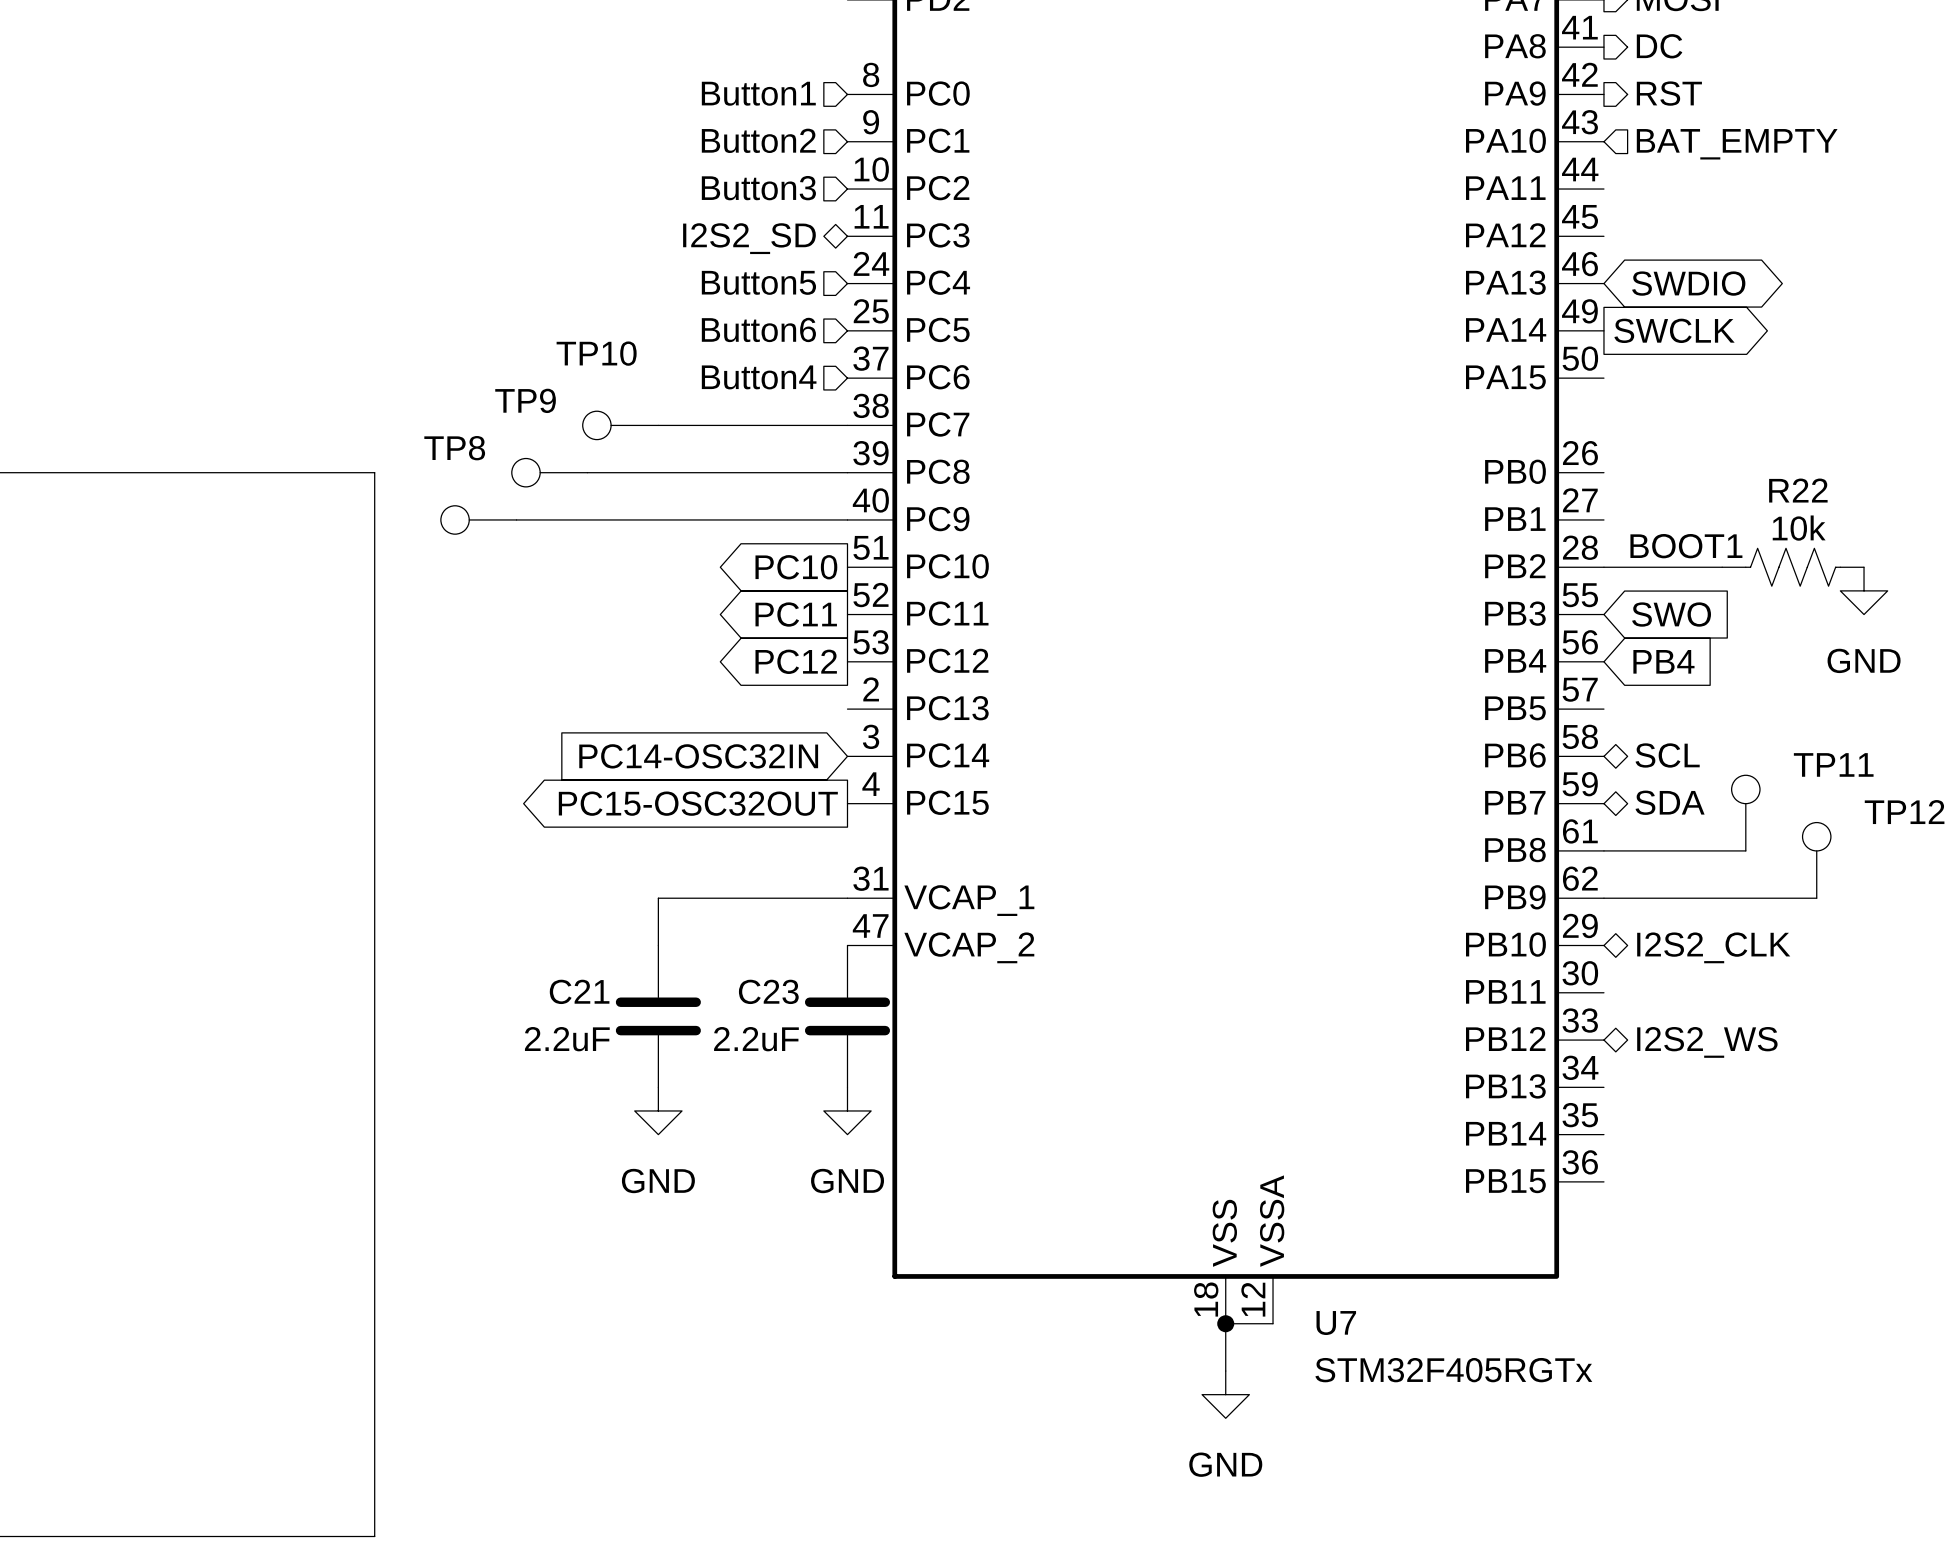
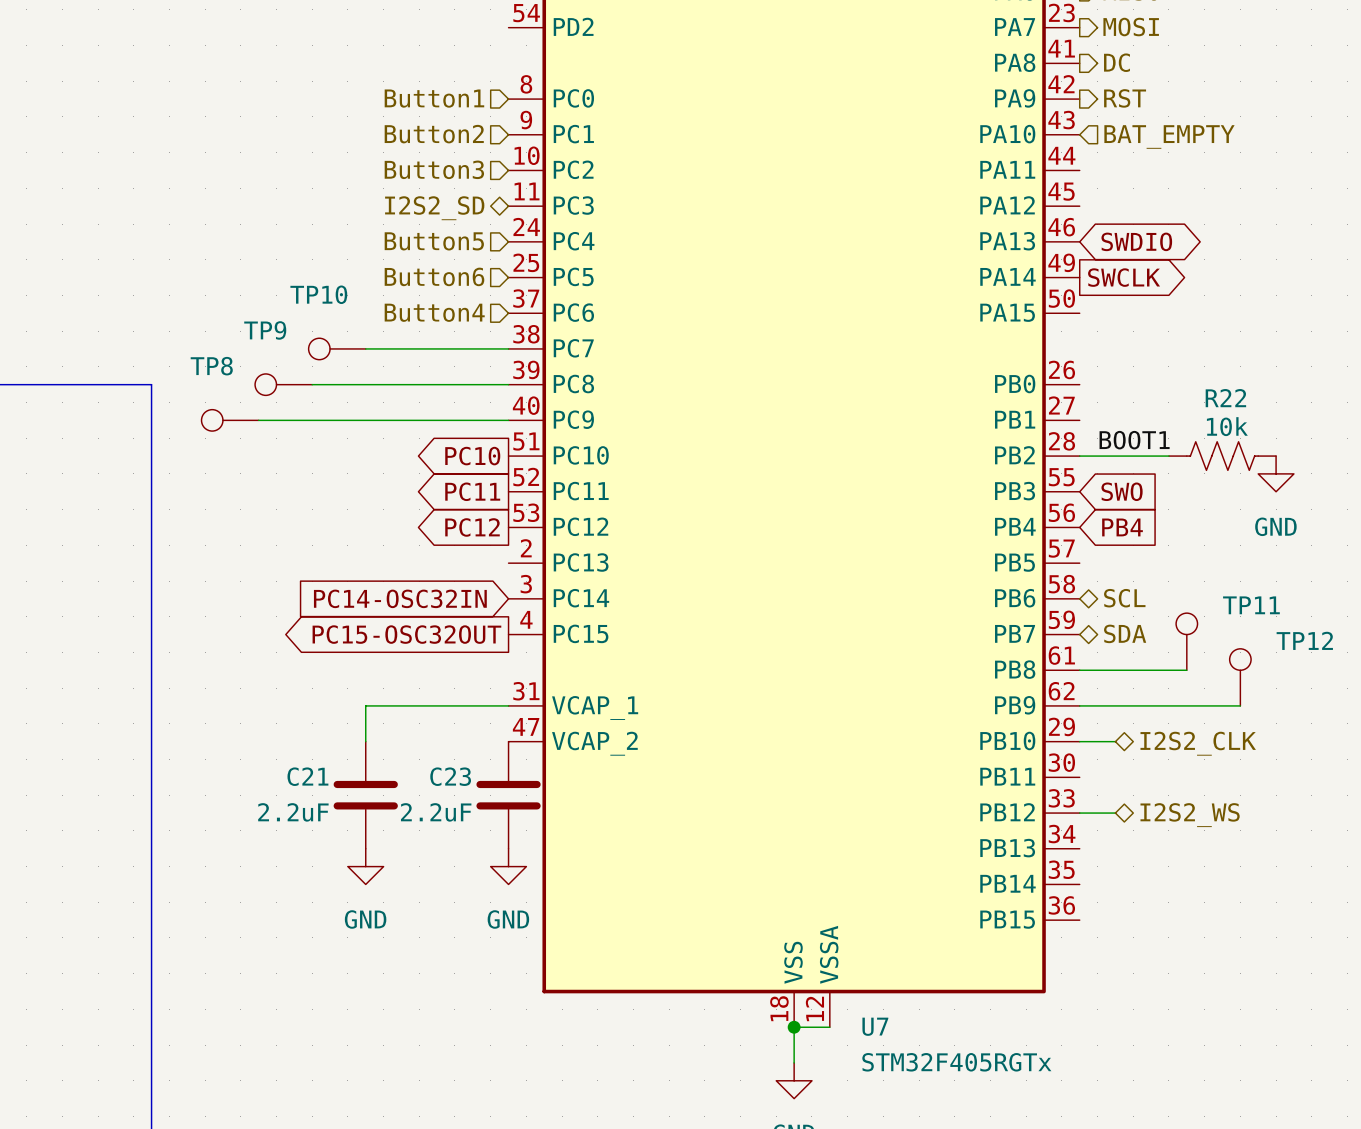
wire: none -> (1079, 741) (1115, 741)
hierarchical label position: I2S2_CLK (1713, 947) -> I2S2_CLK (1198, 743)
wire: none -> (1079, 813) (1115, 813)
hierarchical label position: I2S2_WS (1707, 1042) -> I2S2_WS (1190, 815)

